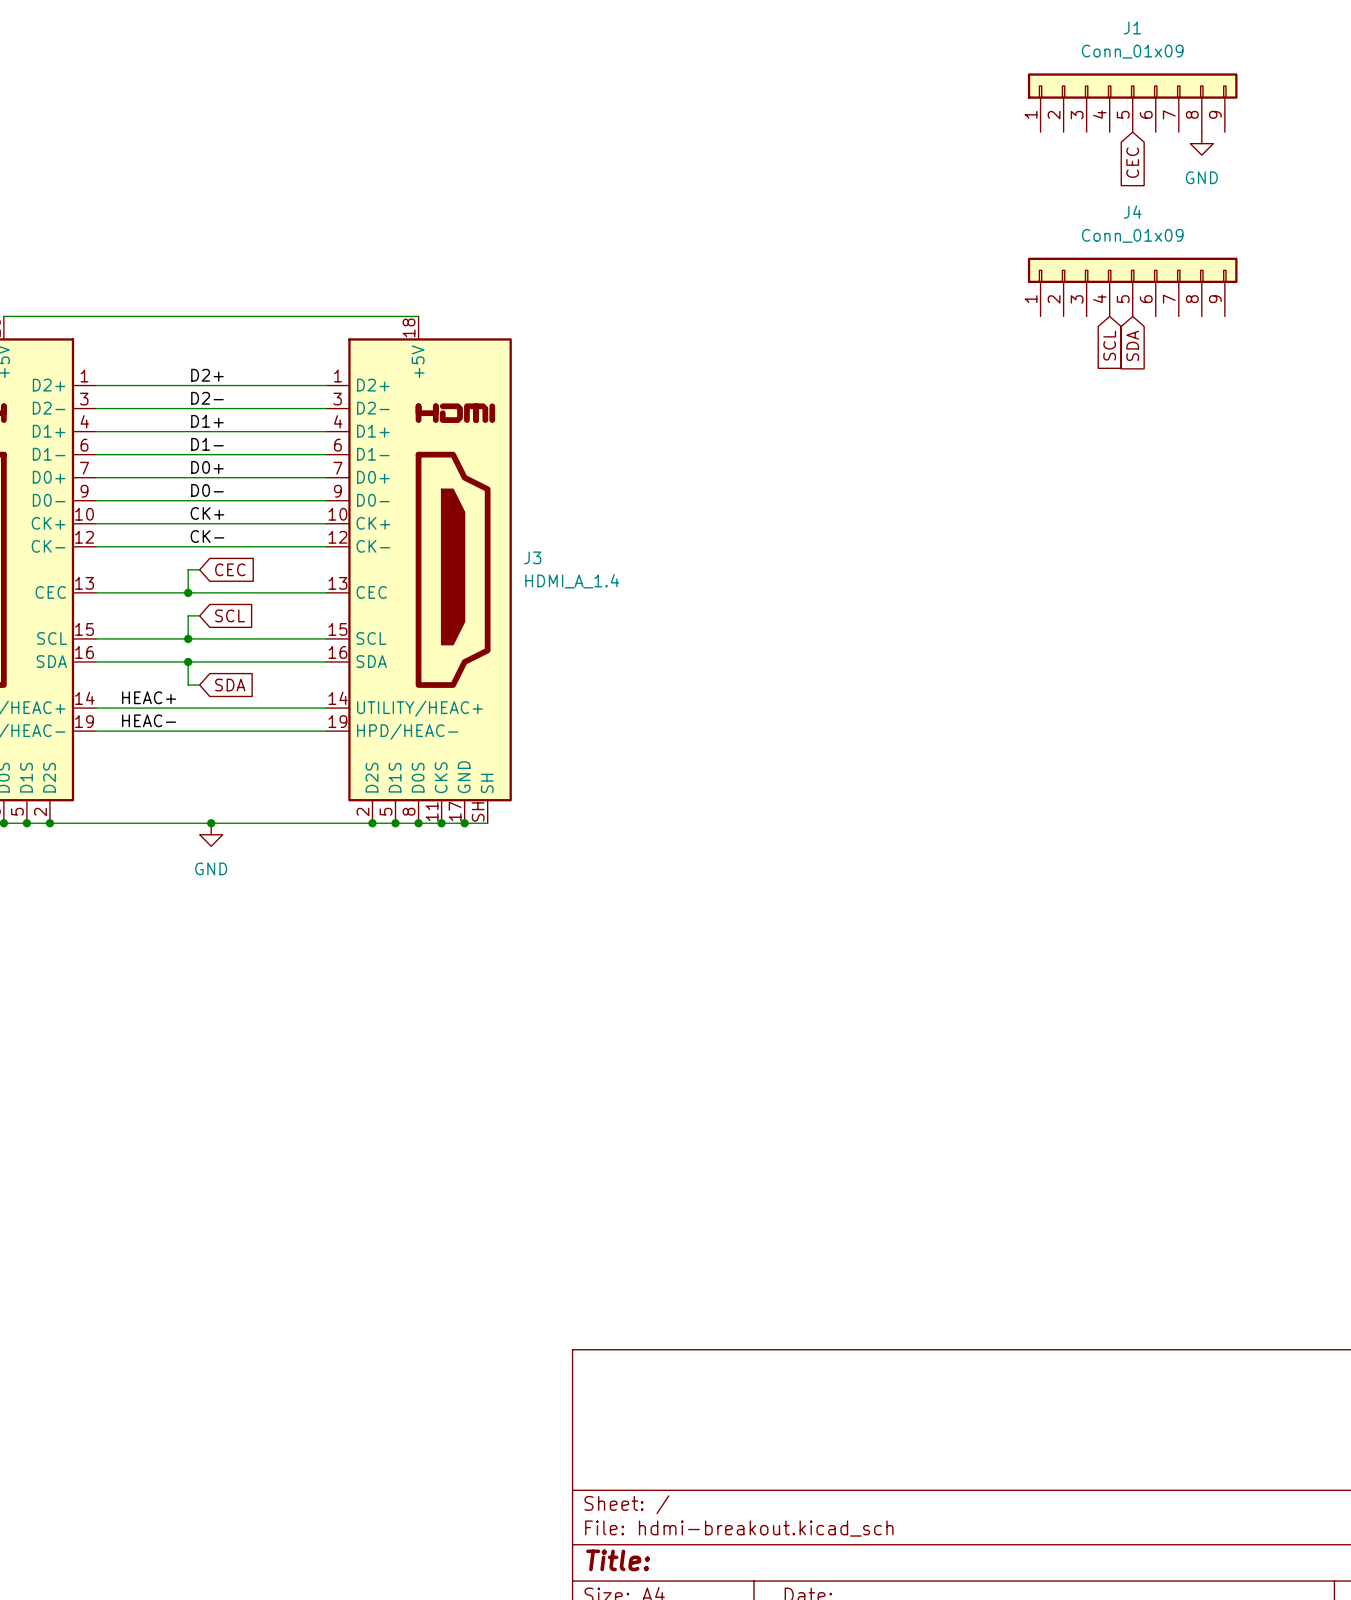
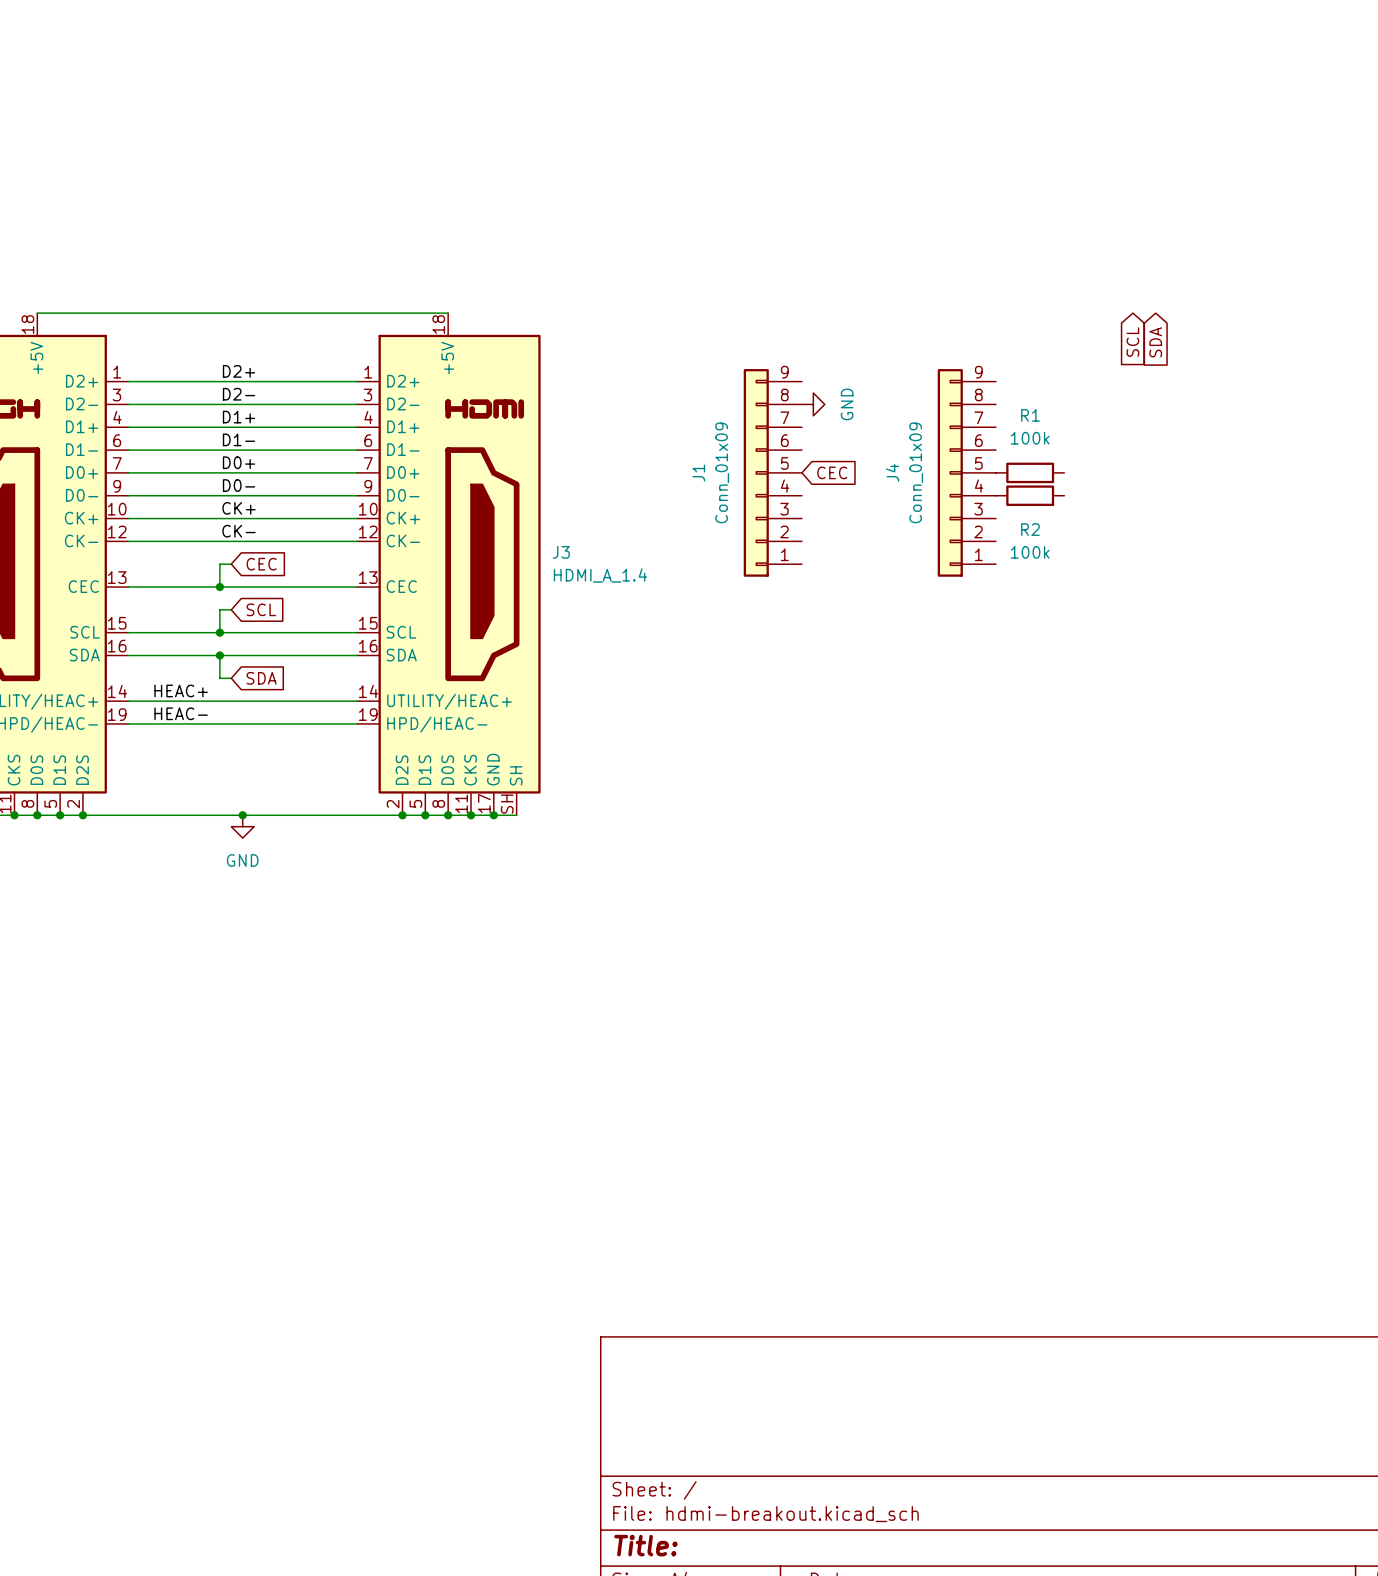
J1 rotation: 0° (1132, 86) -> 90° counterclockwise (756, 472)
J1 position: (1132, 102) -> (772, 472)
power symbol: GND (1201, 143) -> none
global label: CEC (1132, 162) -> none
J4 rotation: 0° (1132, 270) -> 90° counterclockwise (950, 472)
J4 position: (1132, 287) -> (966, 472)
power symbol: none -> GND (813, 404)
global label: none -> CEC (832, 472)
R1: none -> 100k (1030, 472)
R2: none -> 100k (1030, 495)

